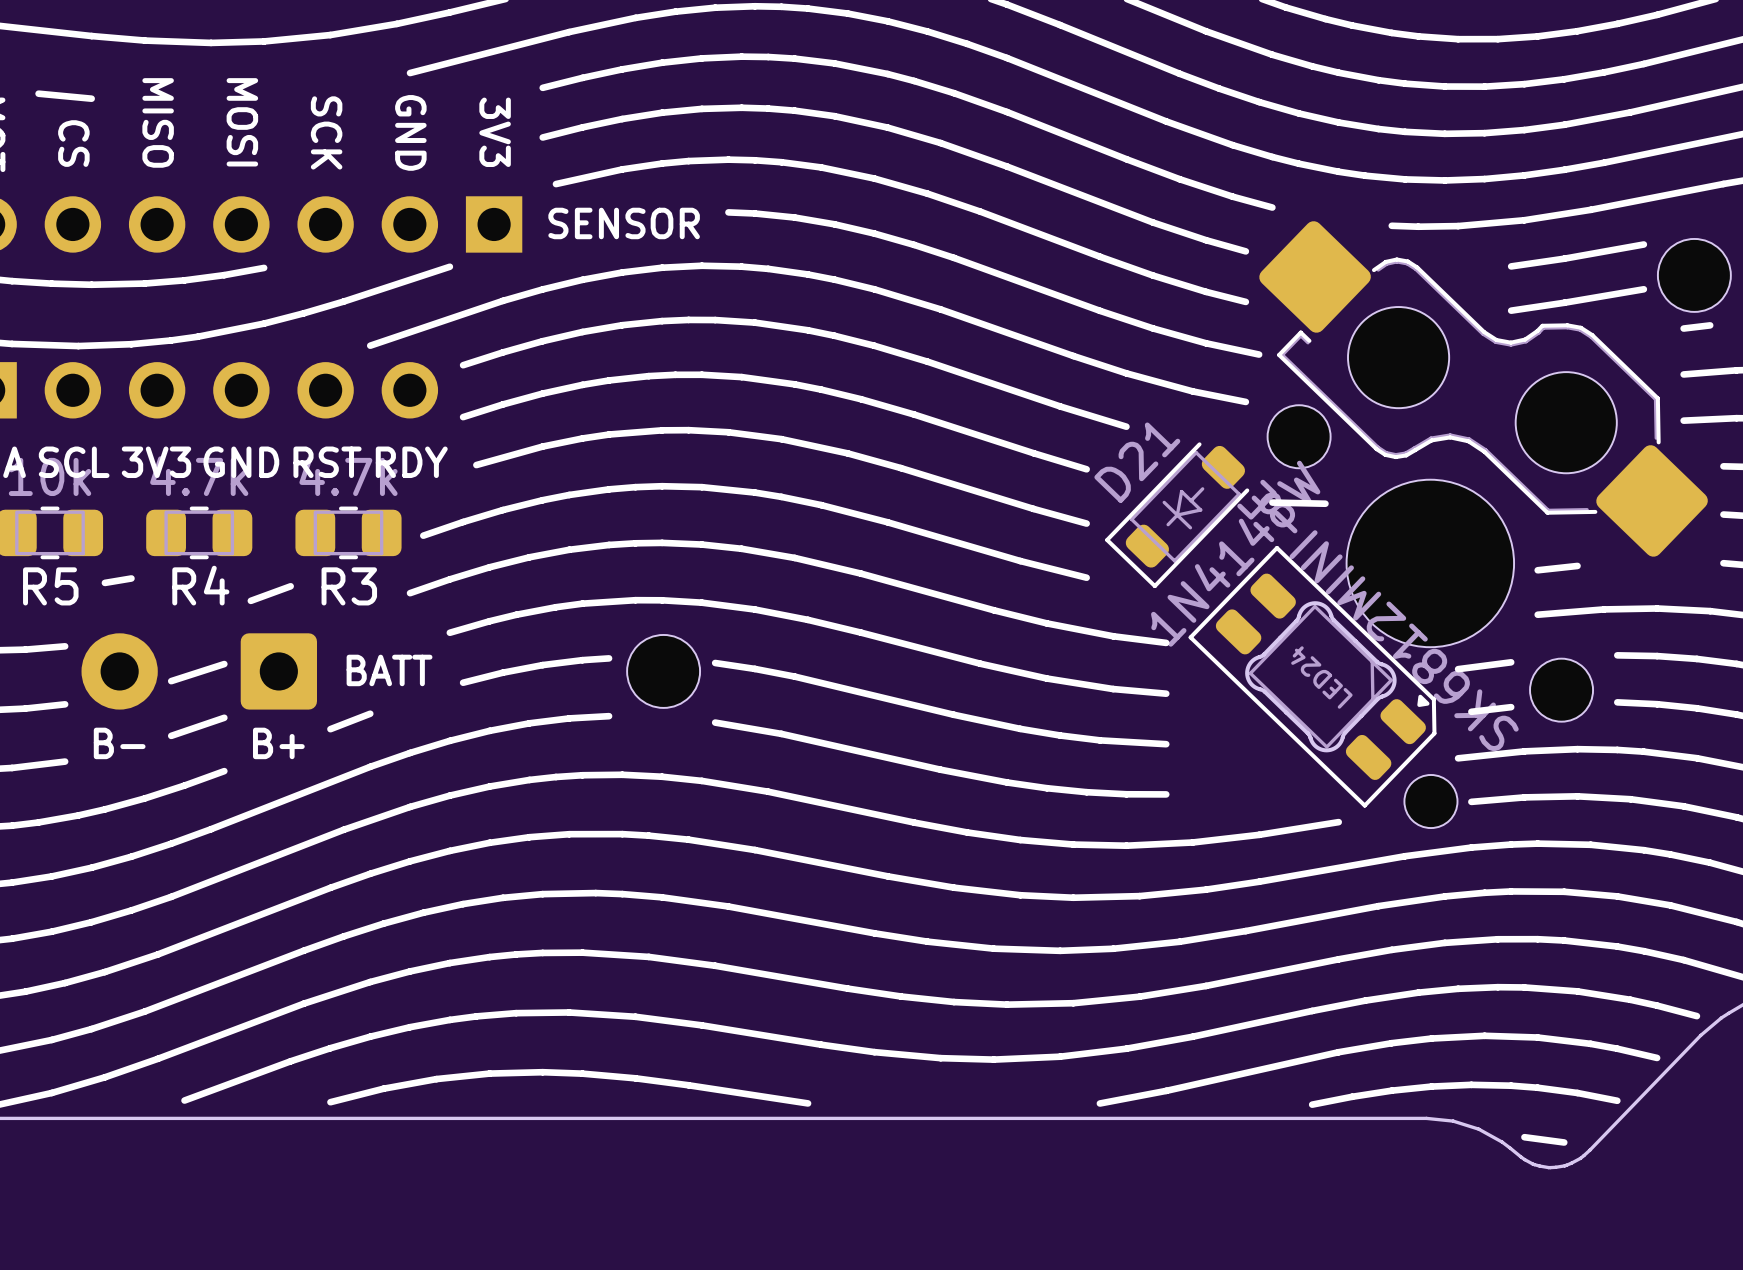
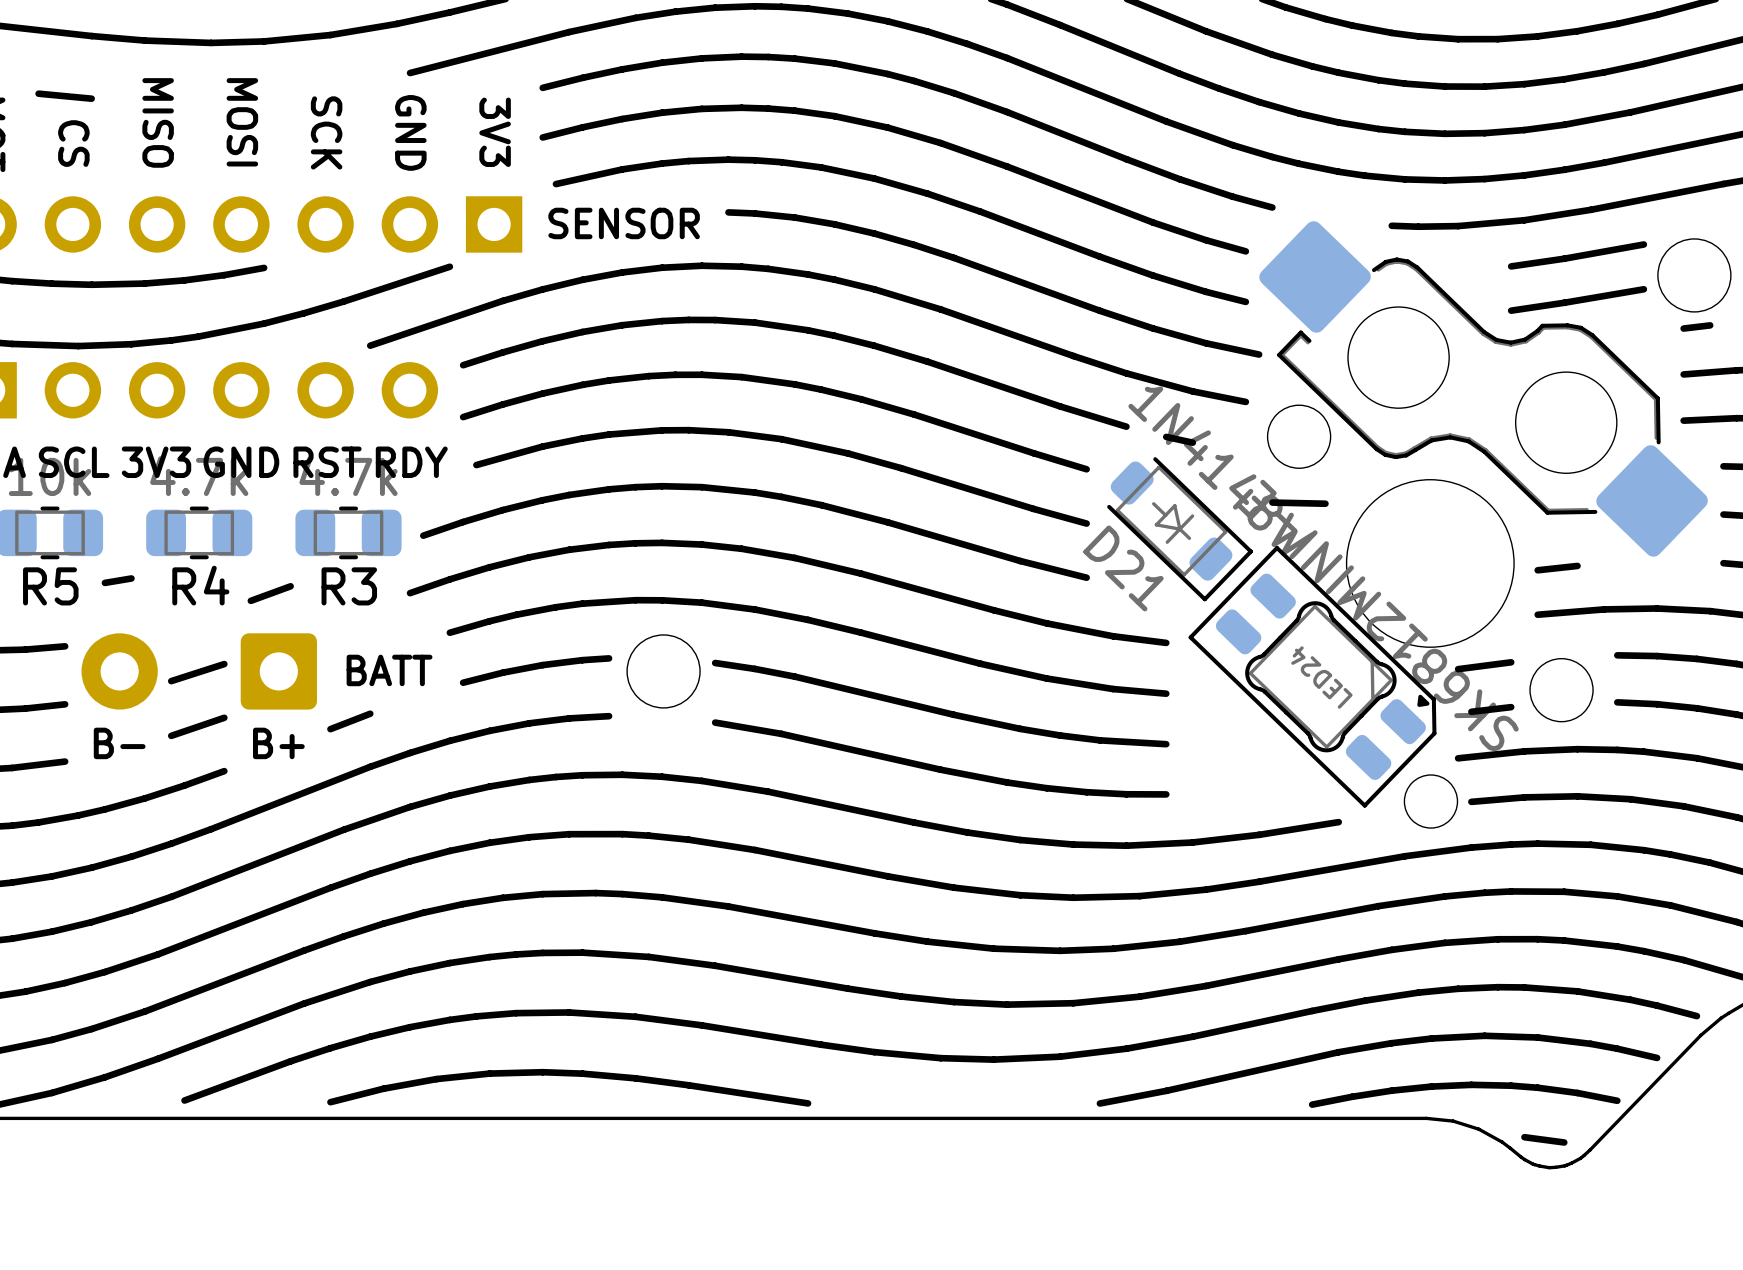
line: none -> (1166, 436) (1192, 442)
D21 rotation: 0° (1177, 515) -> 90° counterclockwise (1180, 529)

